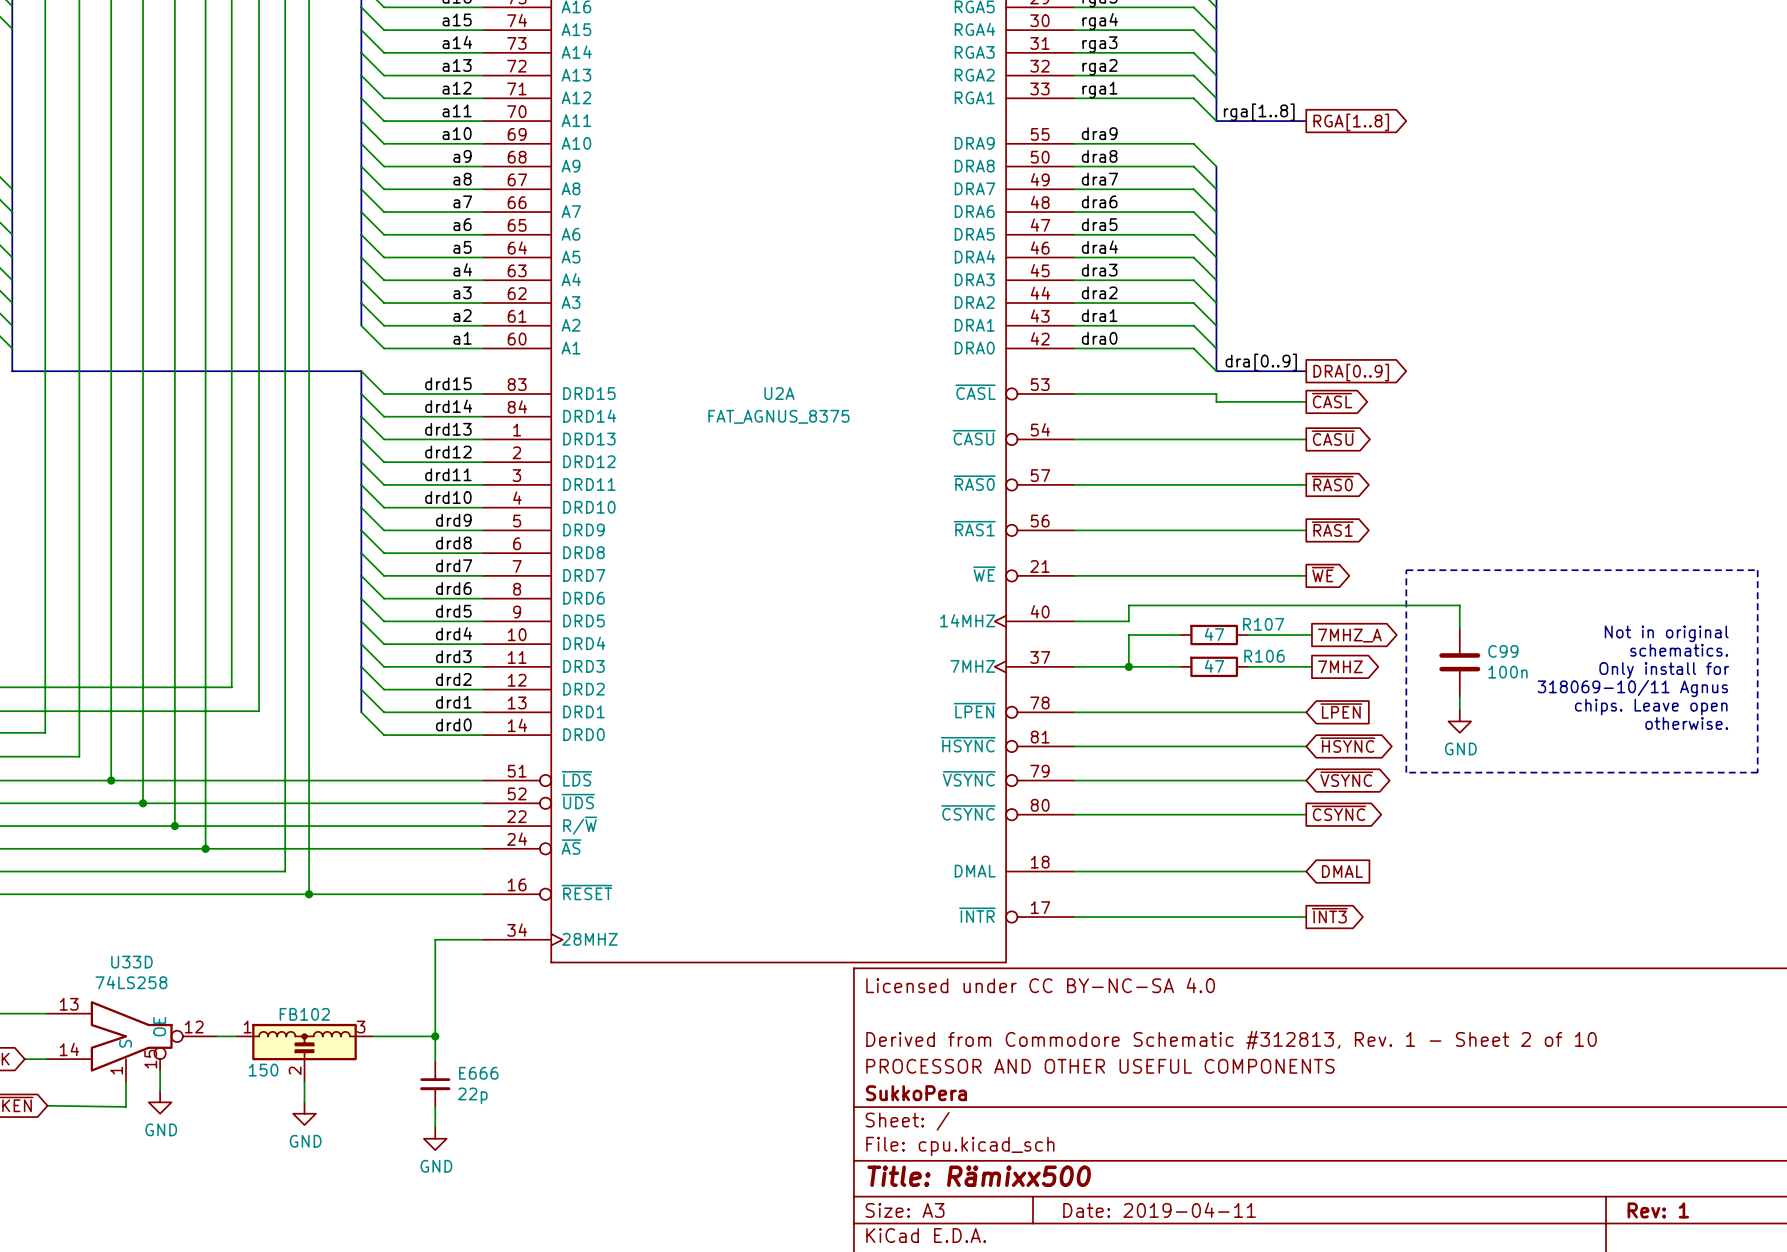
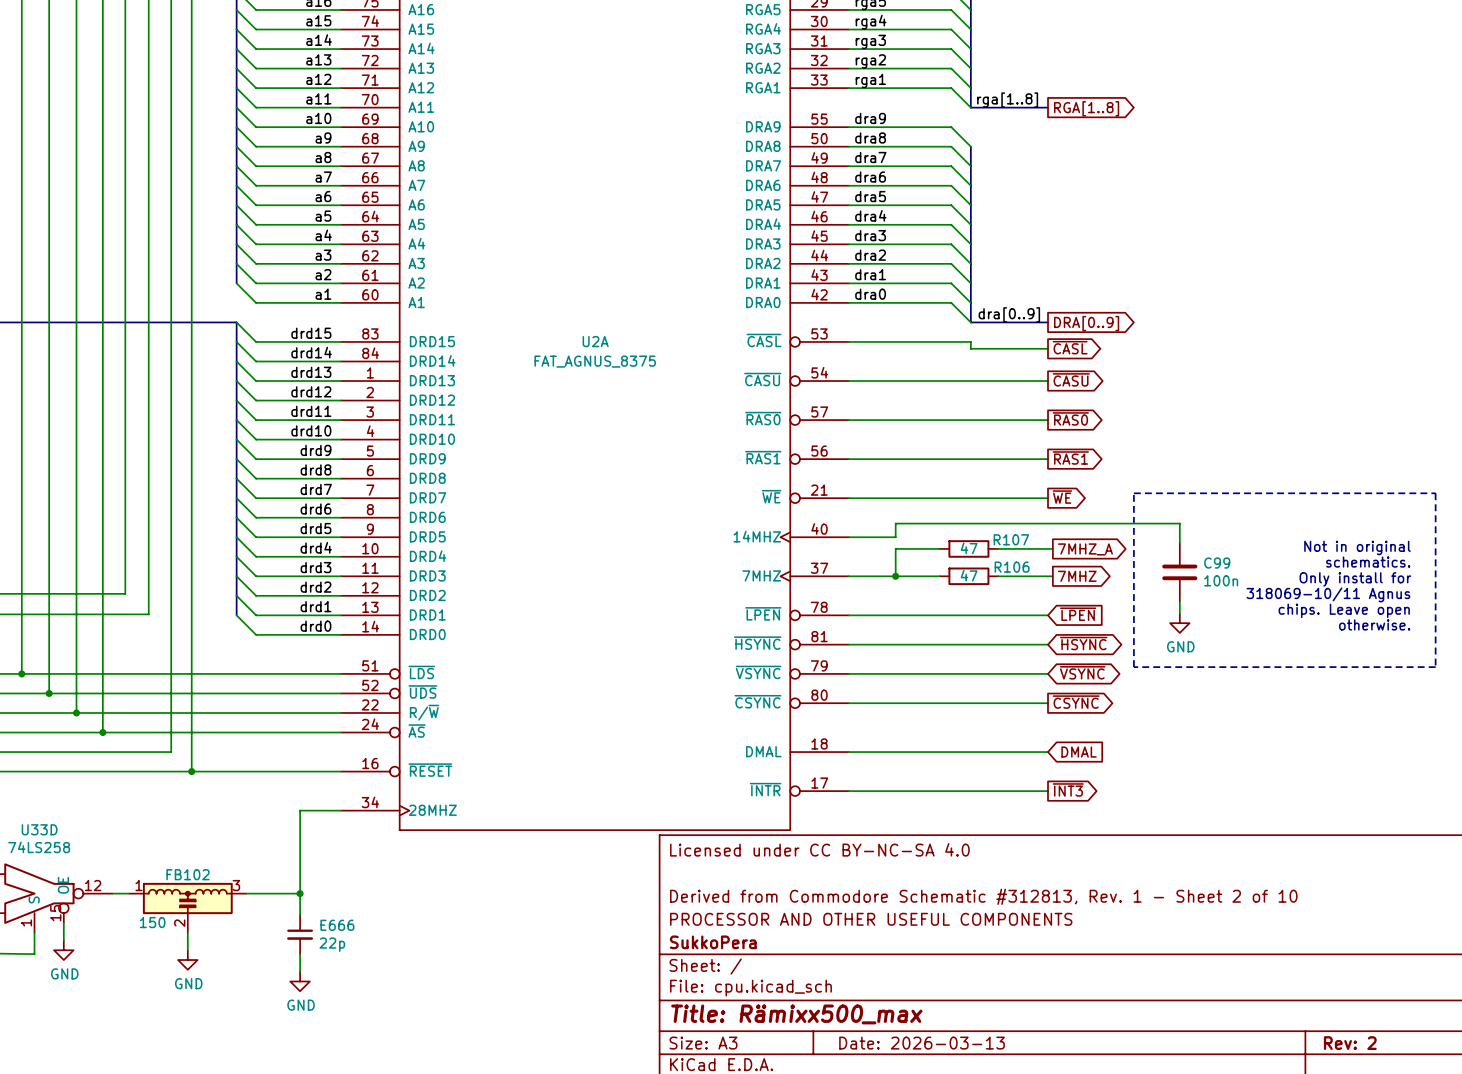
title block: Title: Rämixx500 (979, 1176) -> Title: Rämixx500_max (796, 1014)
title block: Date: 2019-04-11 (1159, 1210) -> Date: 2026-03-13 (922, 1043)
title block: Rev: 1 (1658, 1210) -> Rev: 2 (1350, 1043)

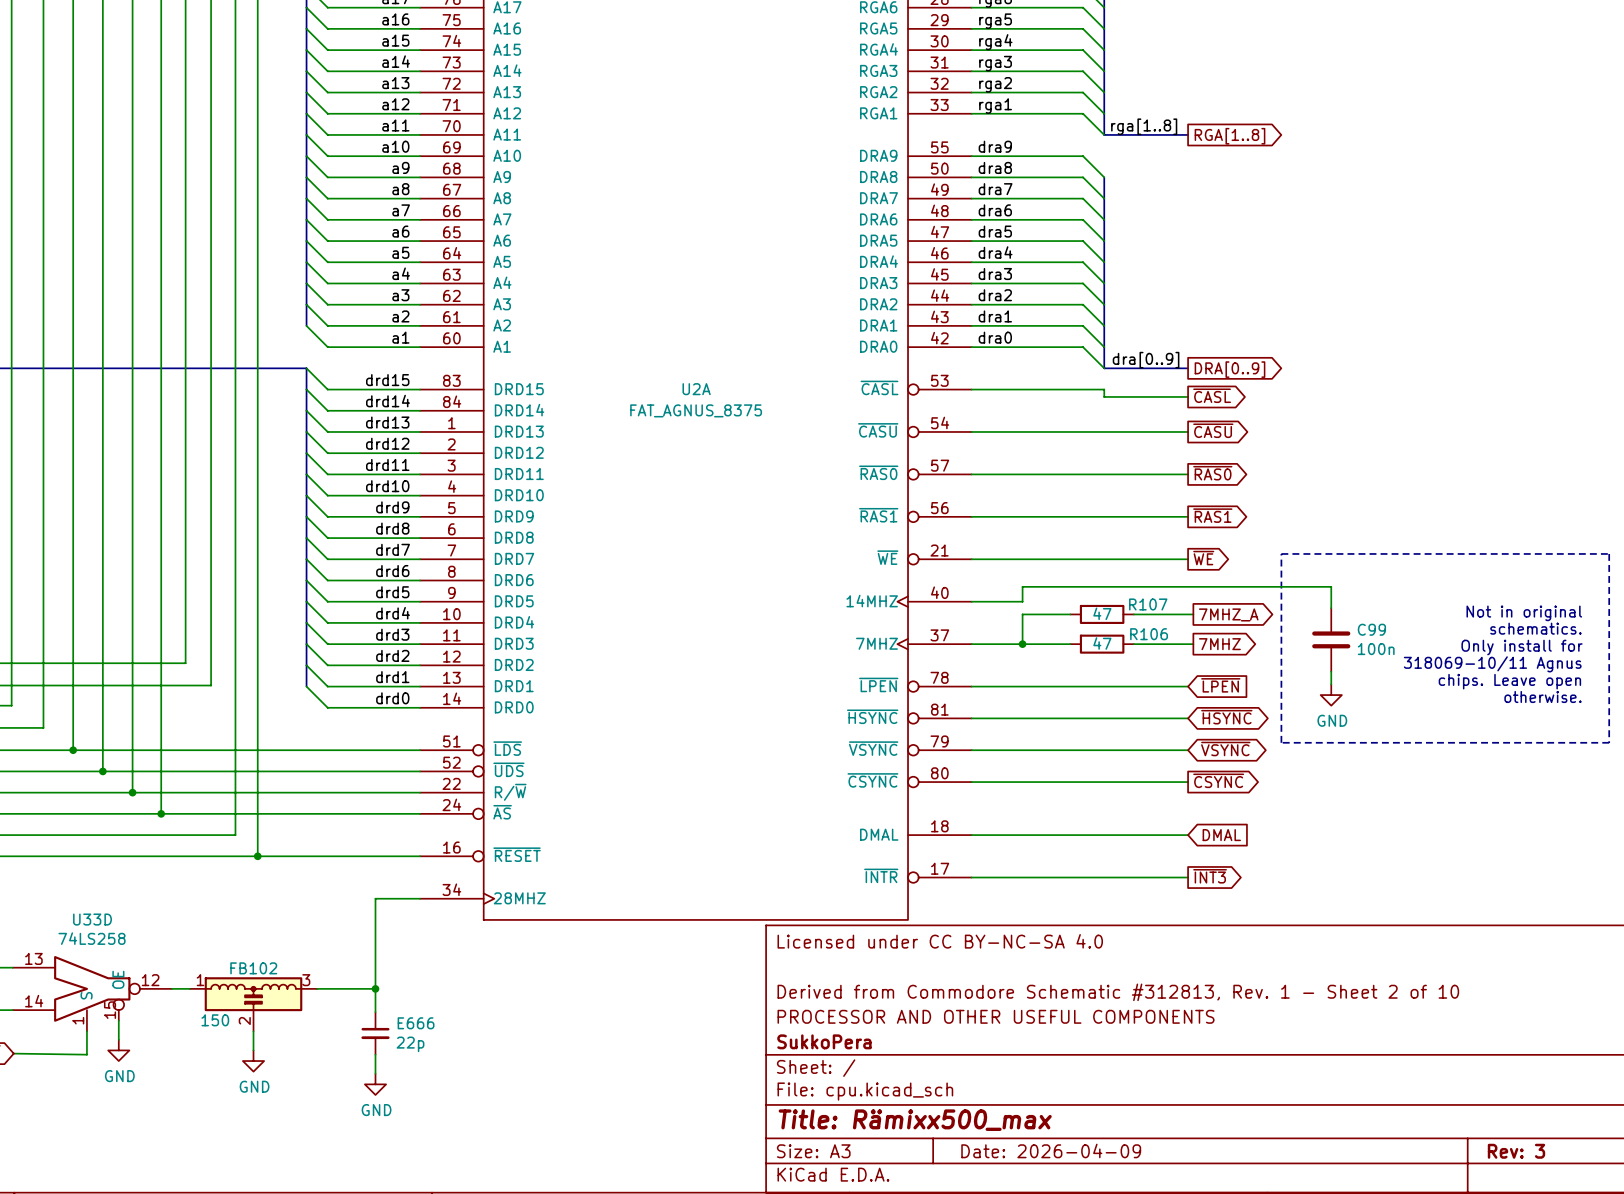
title block: Date: 2026-03-13 (922, 1043) -> Date: 2026-04-09 (1051, 1150)
title block: Rev: 2 (1350, 1043) -> Rev: 3 (1516, 1151)

